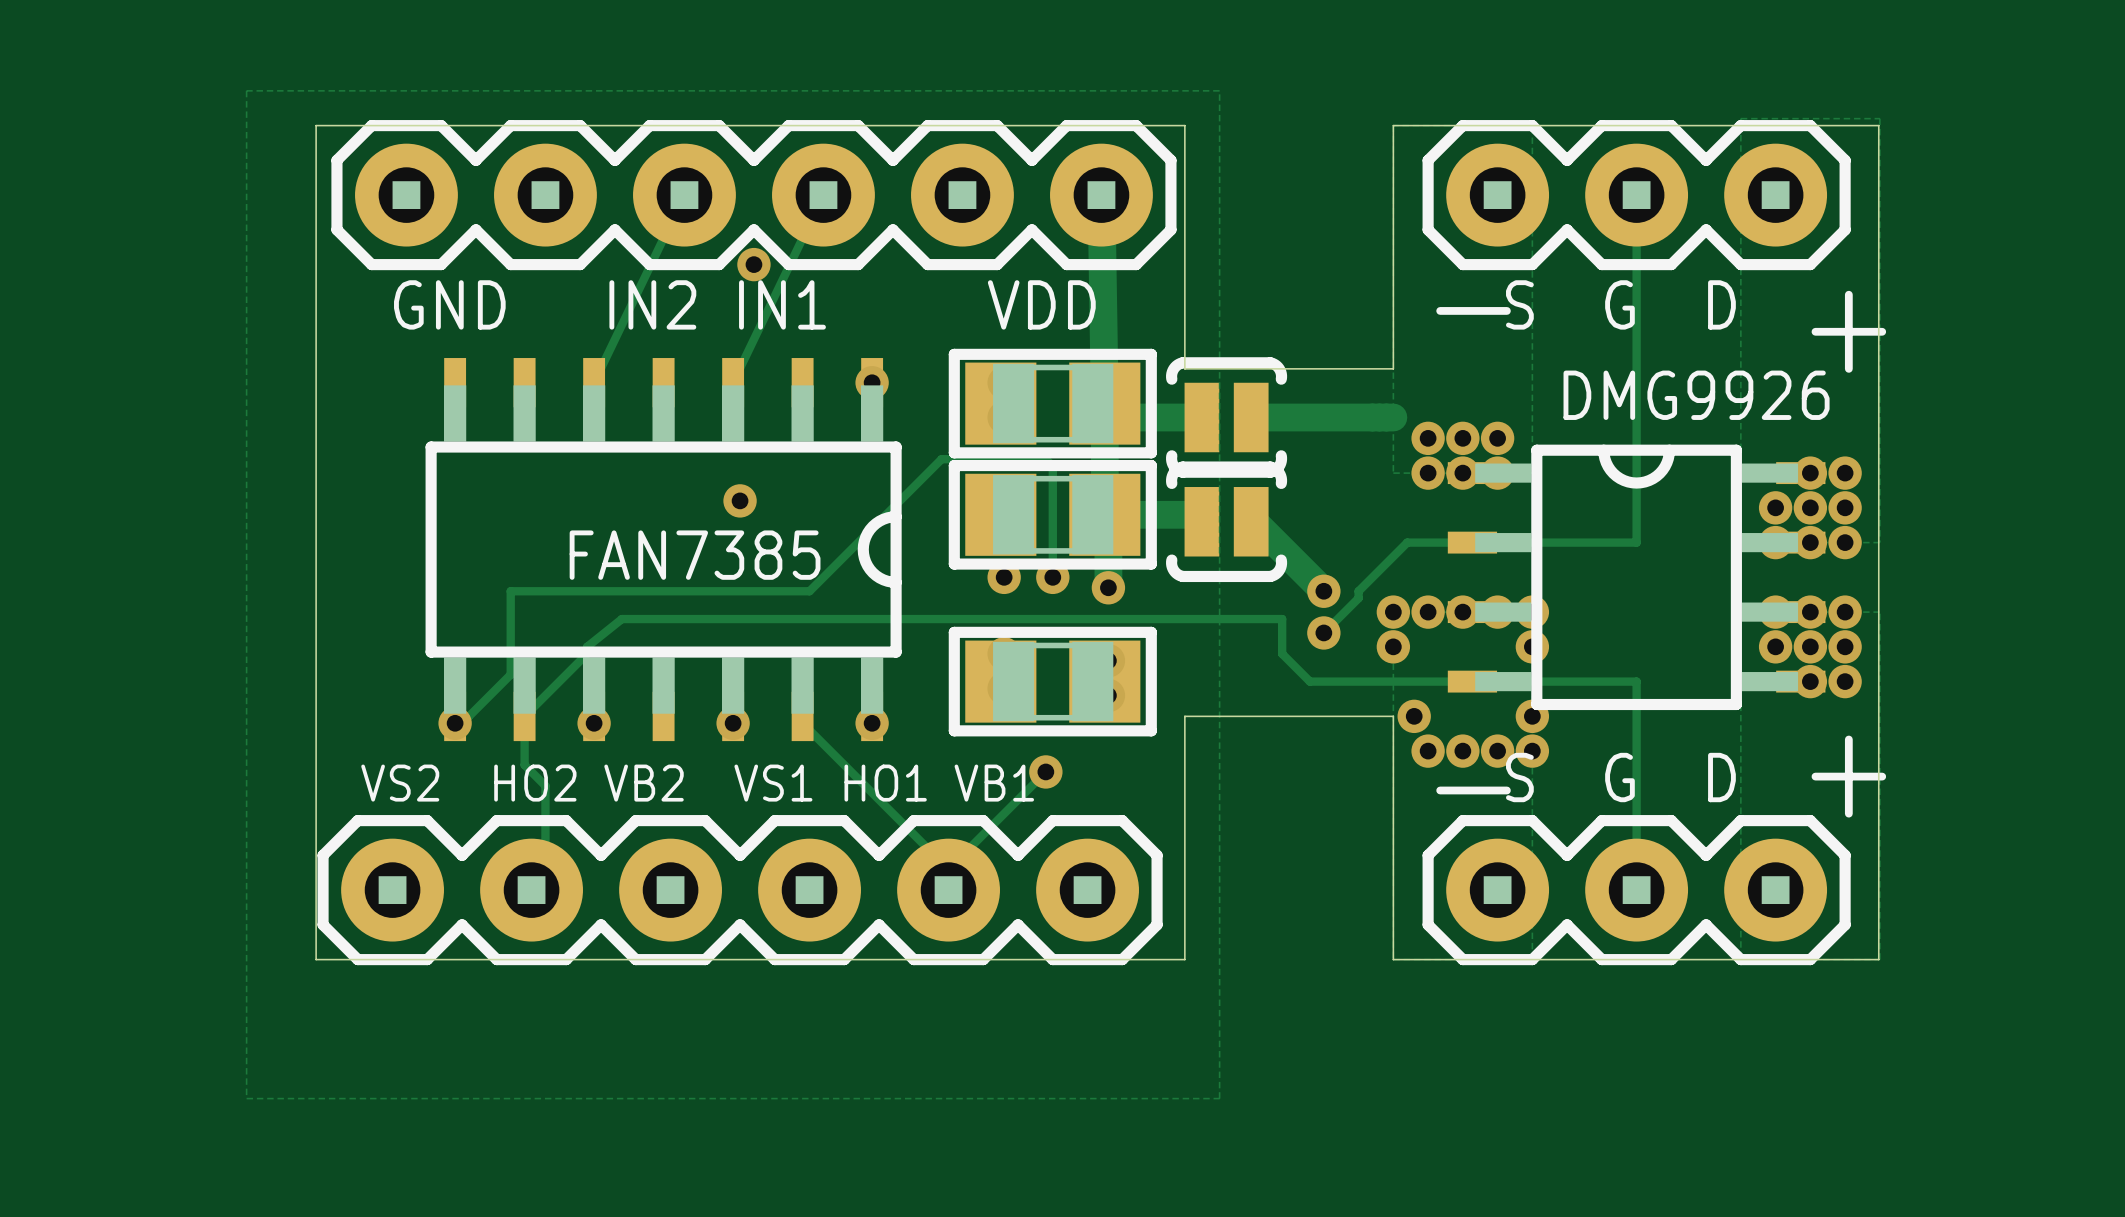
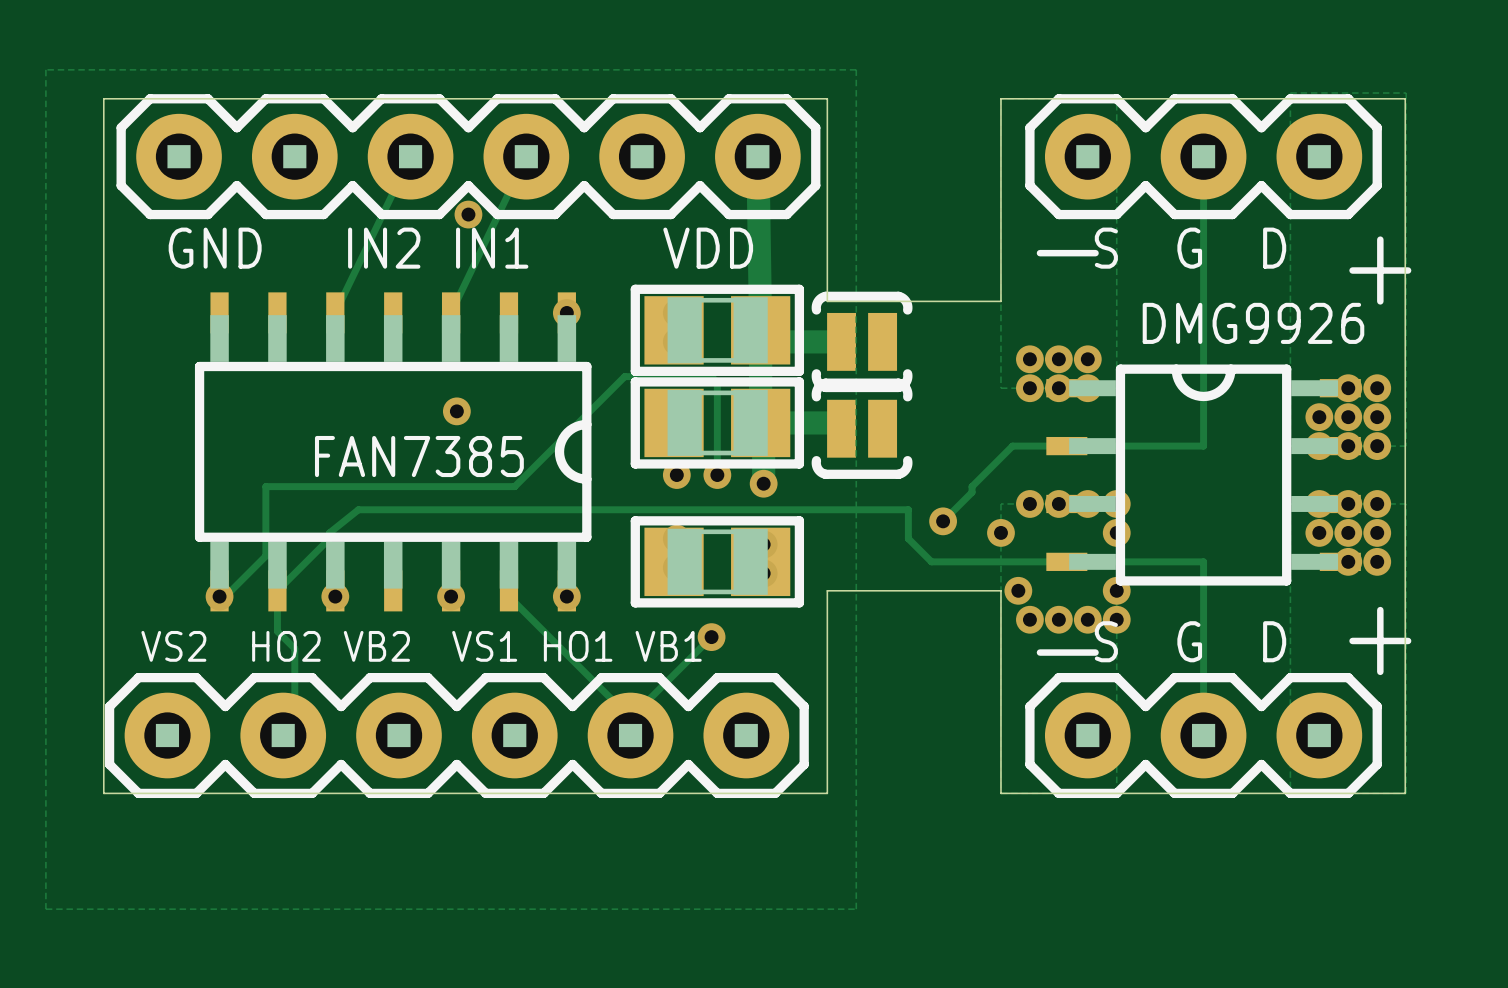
track: (1251, 417) (1393, 417) -> none
track: (1251, 521) (1254, 521) (1323, 591) -> none
via: (1323, 591) -> none
via: (1393, 612) -> none

